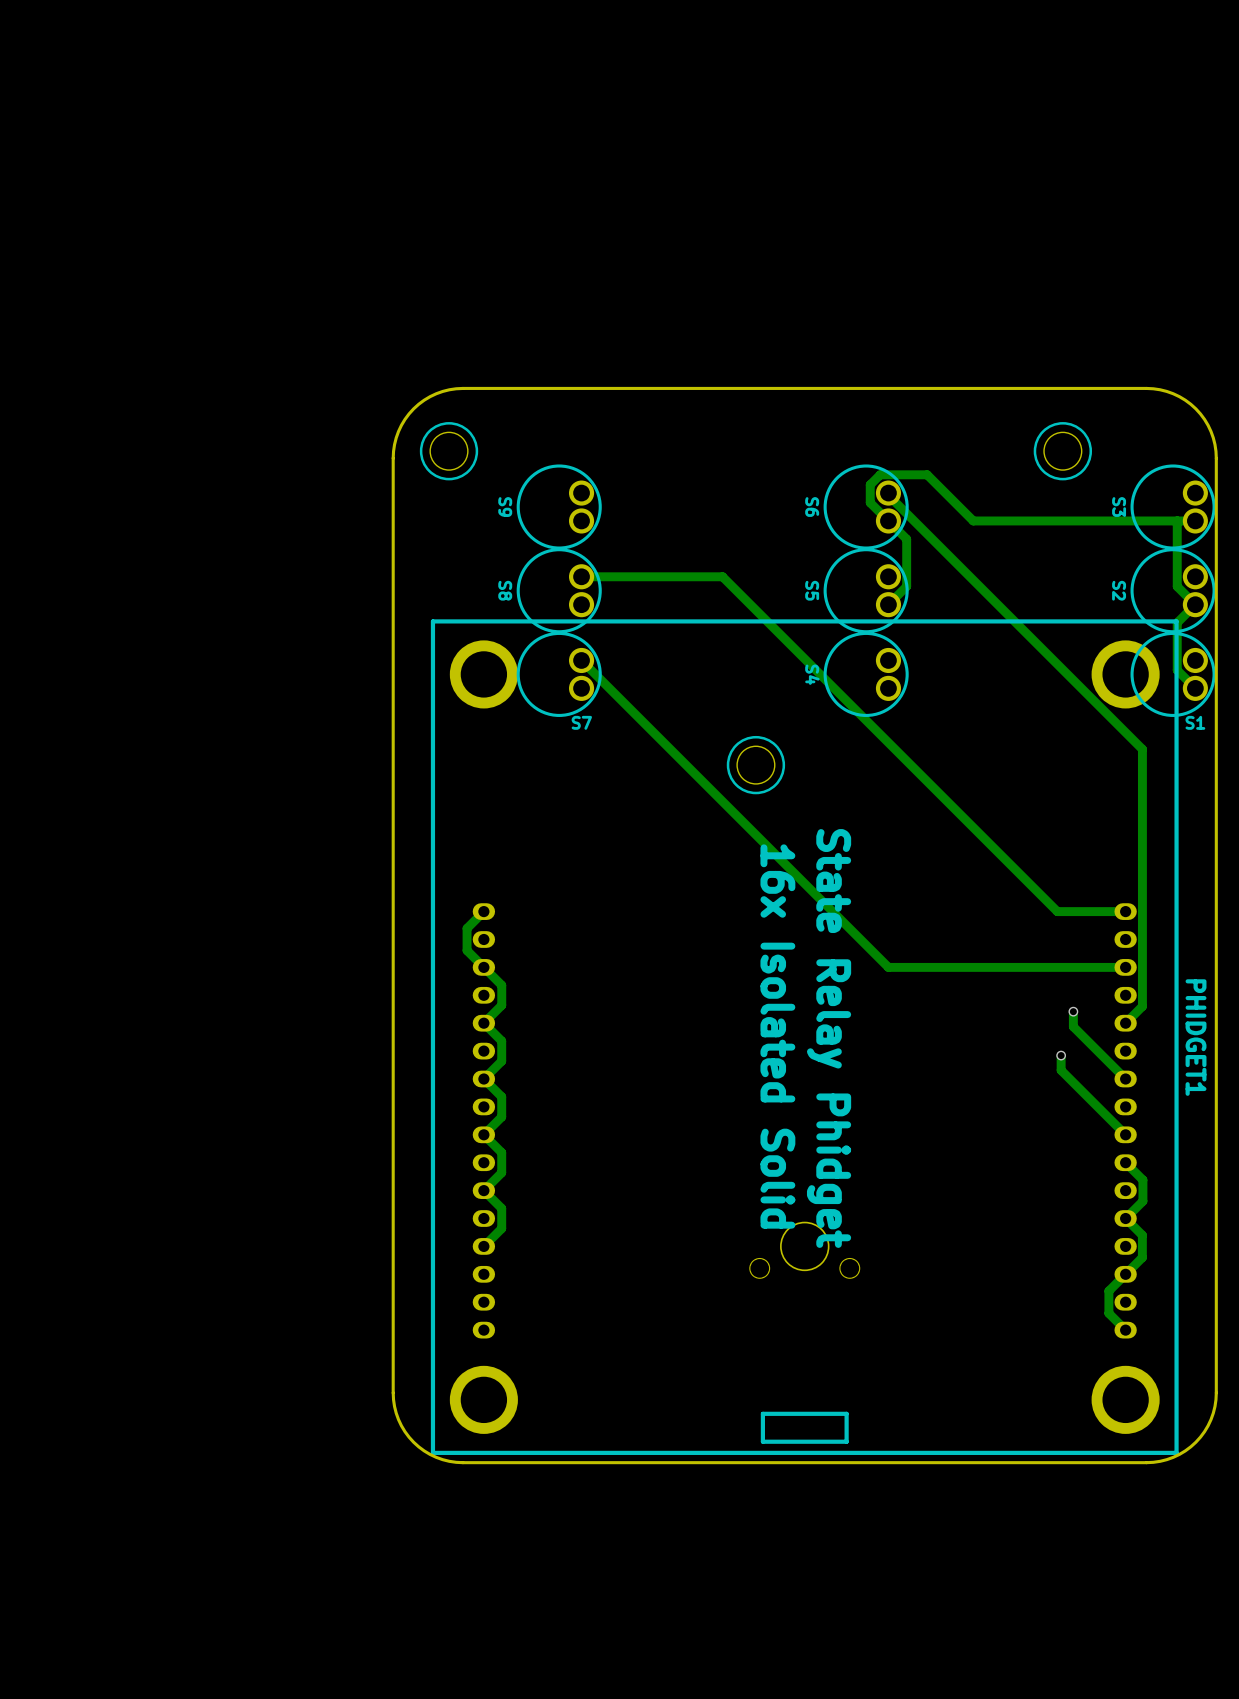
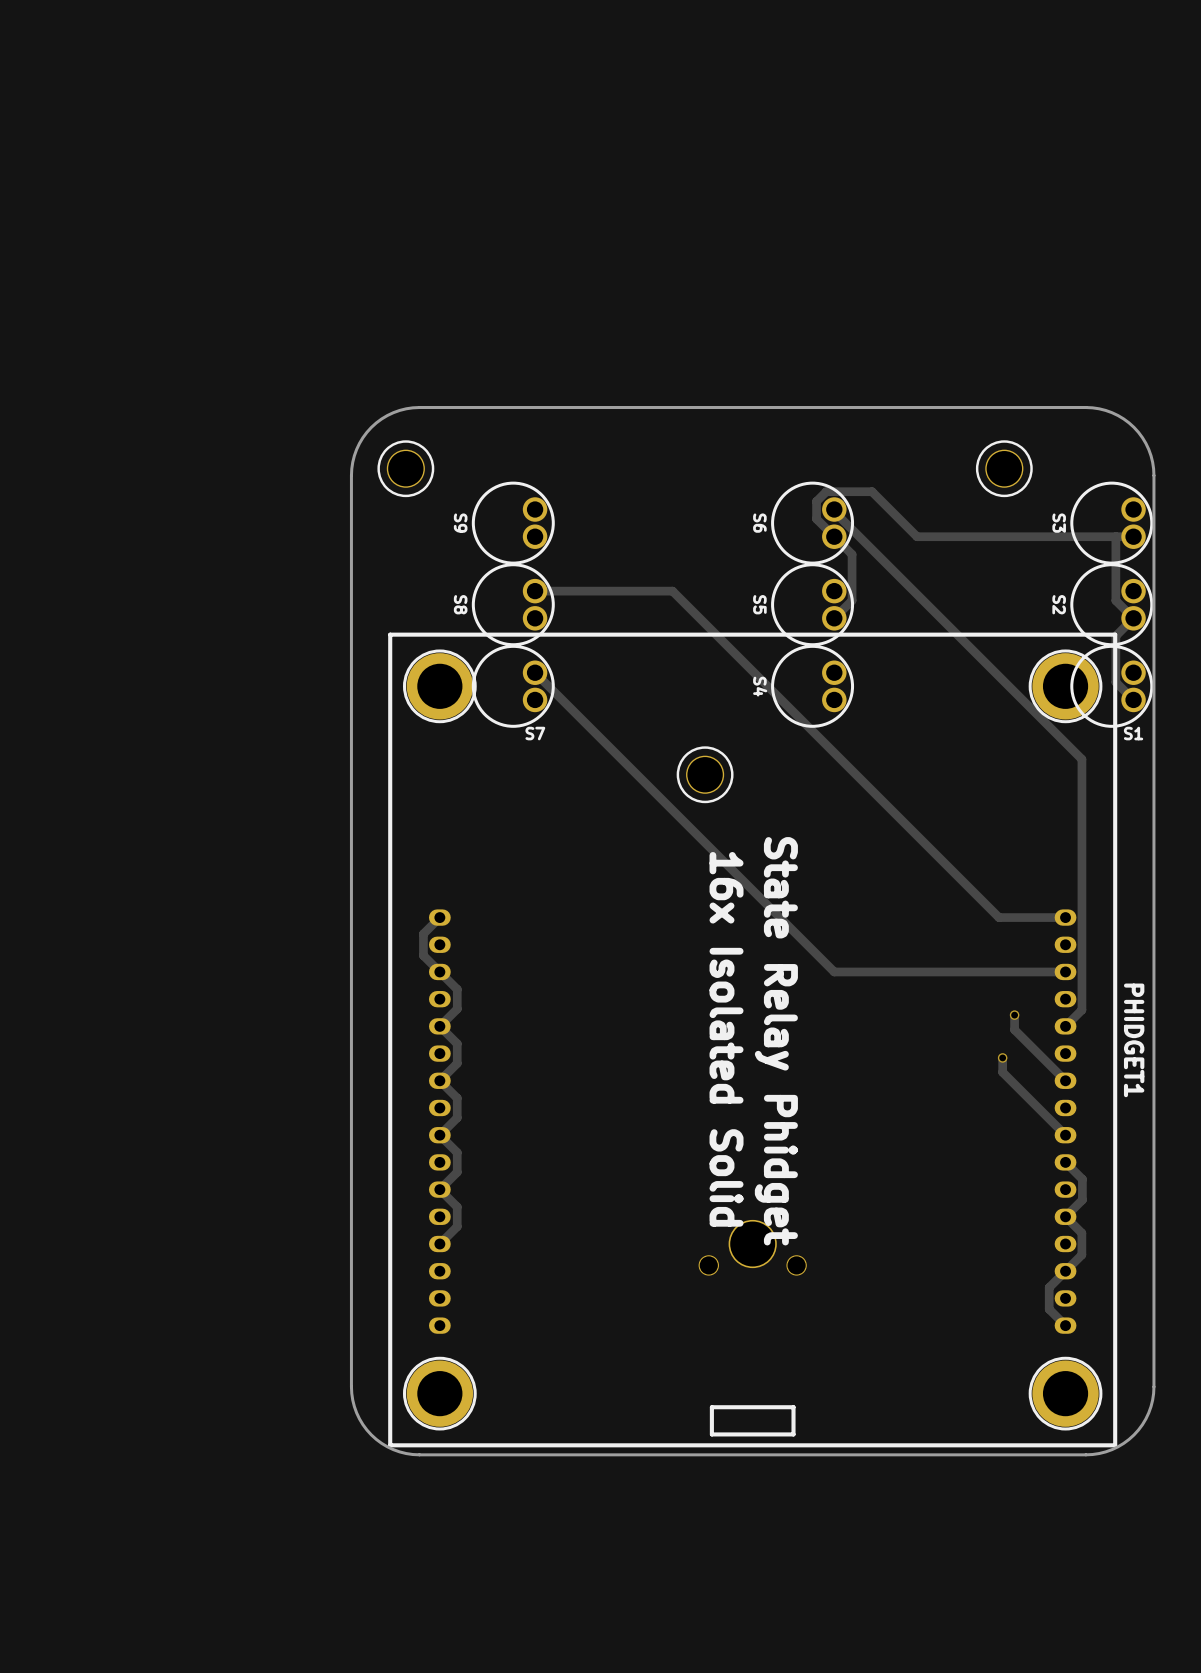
PHIDGET1 footprint: [430, 619, 1179, 1455] -> [388, 632, 1118, 1448]

